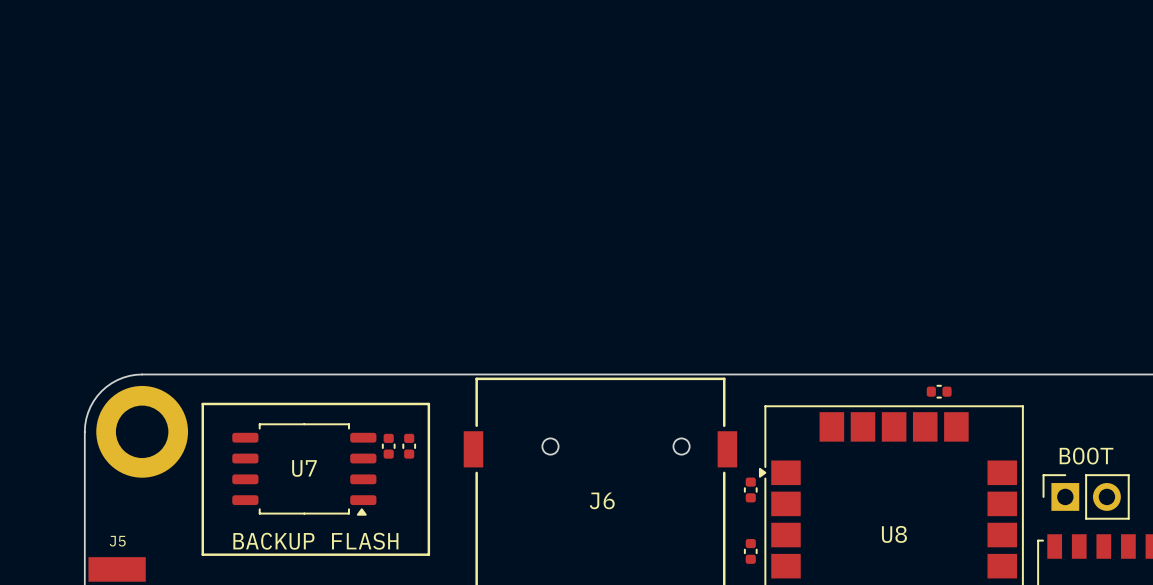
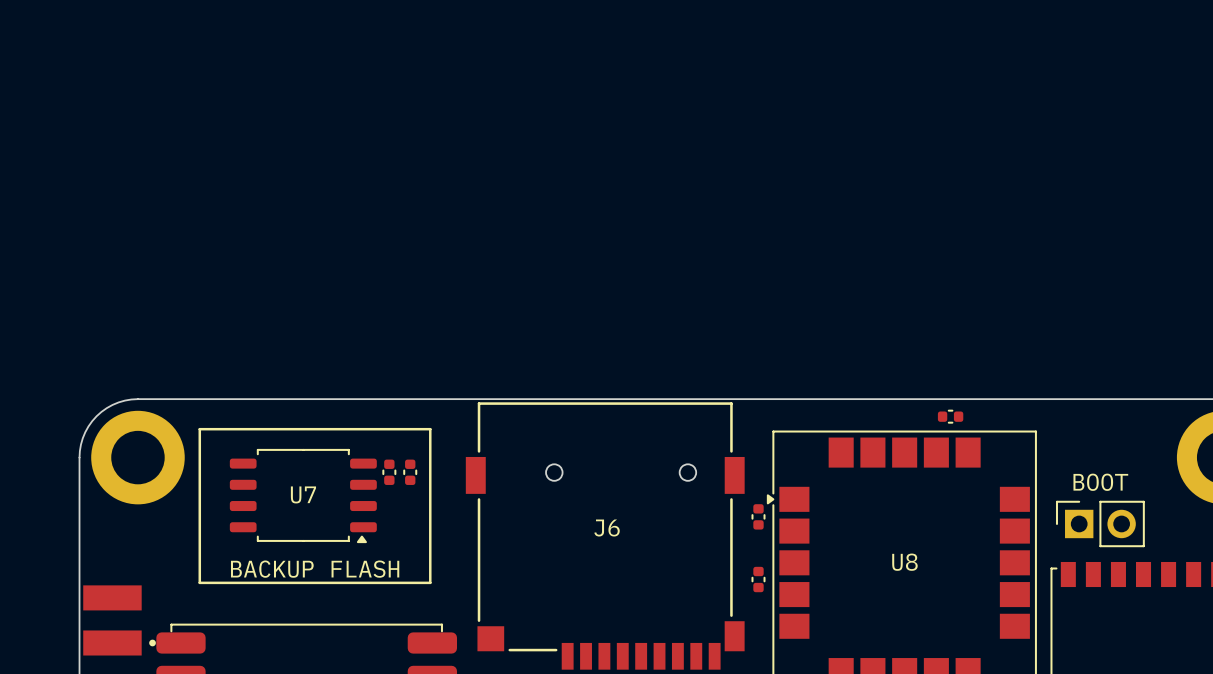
J5 name: J5 (117, 541) -> none

